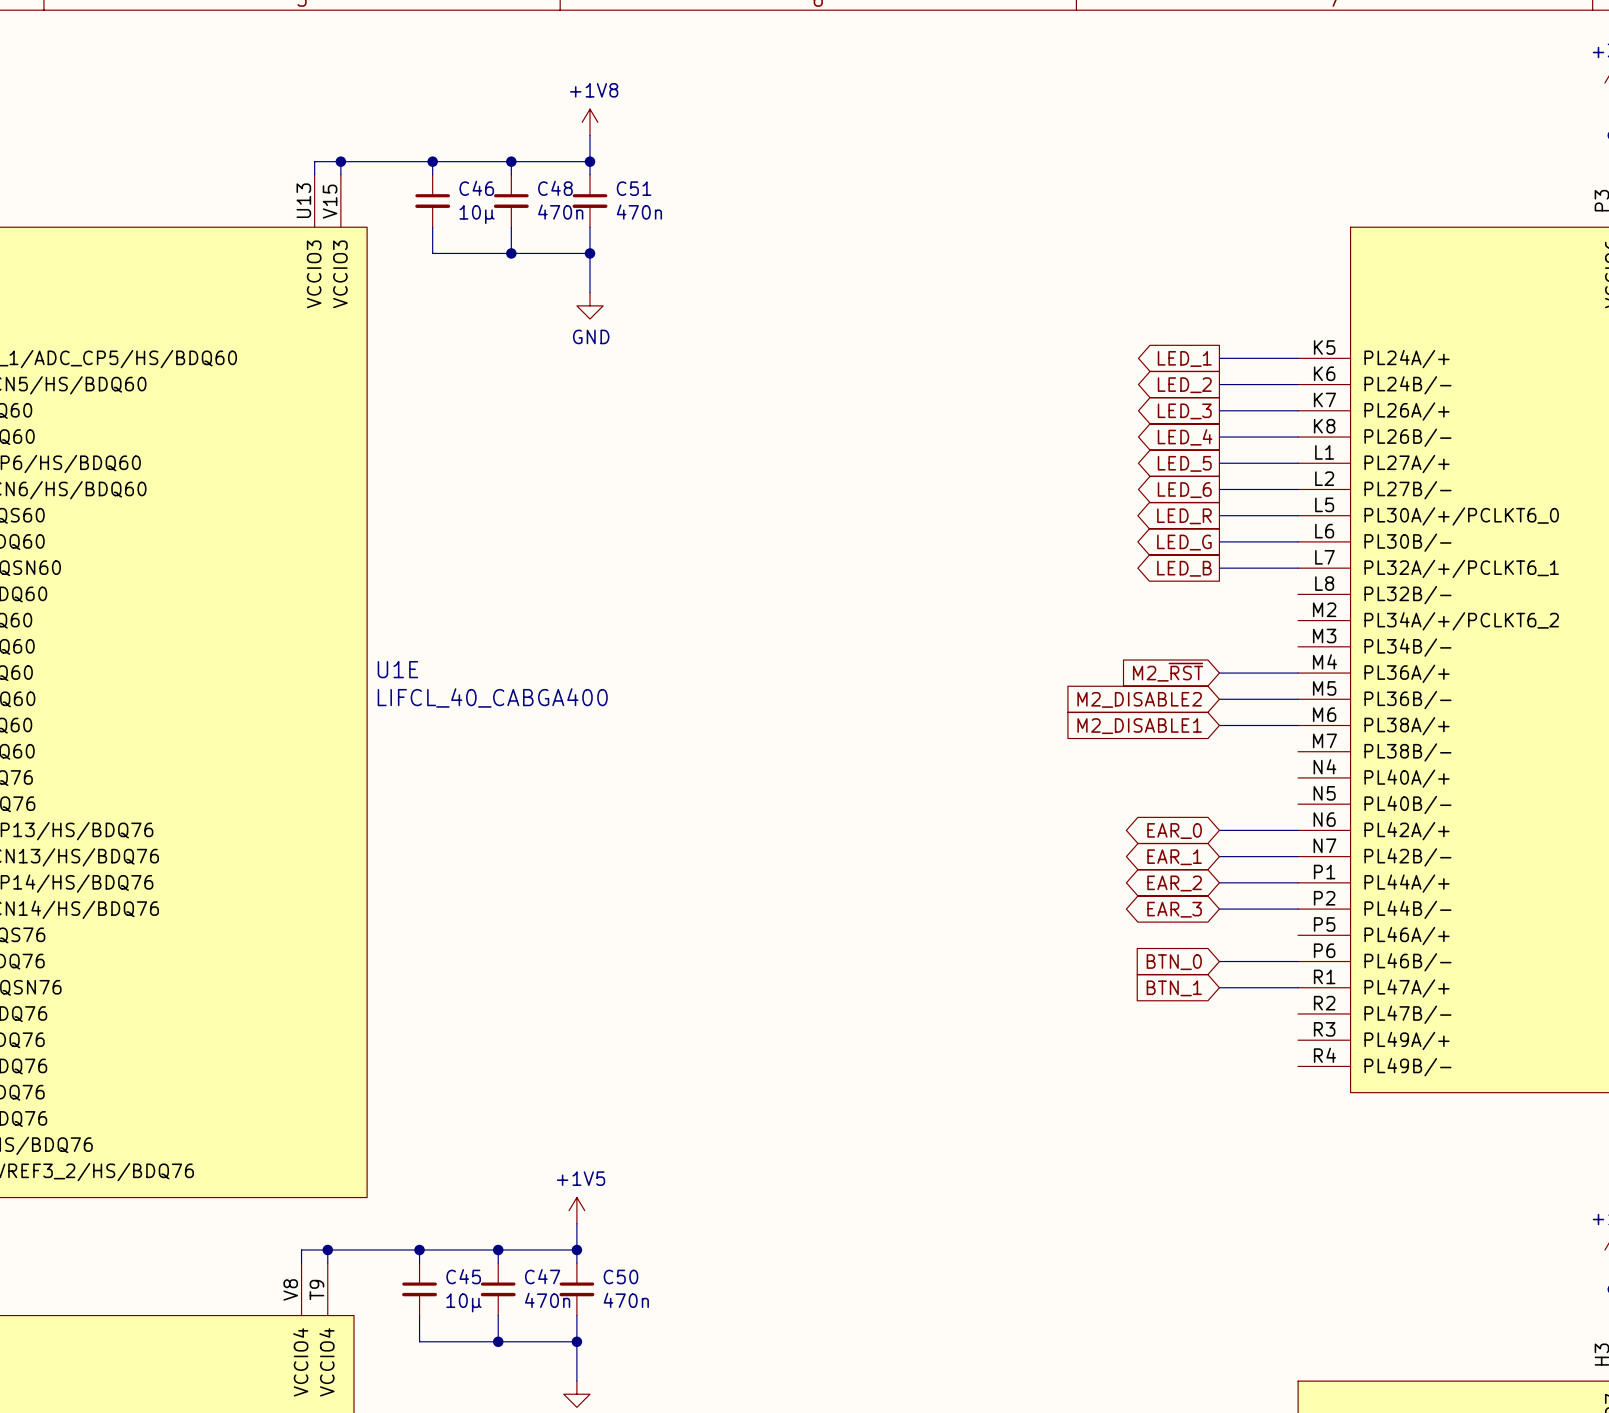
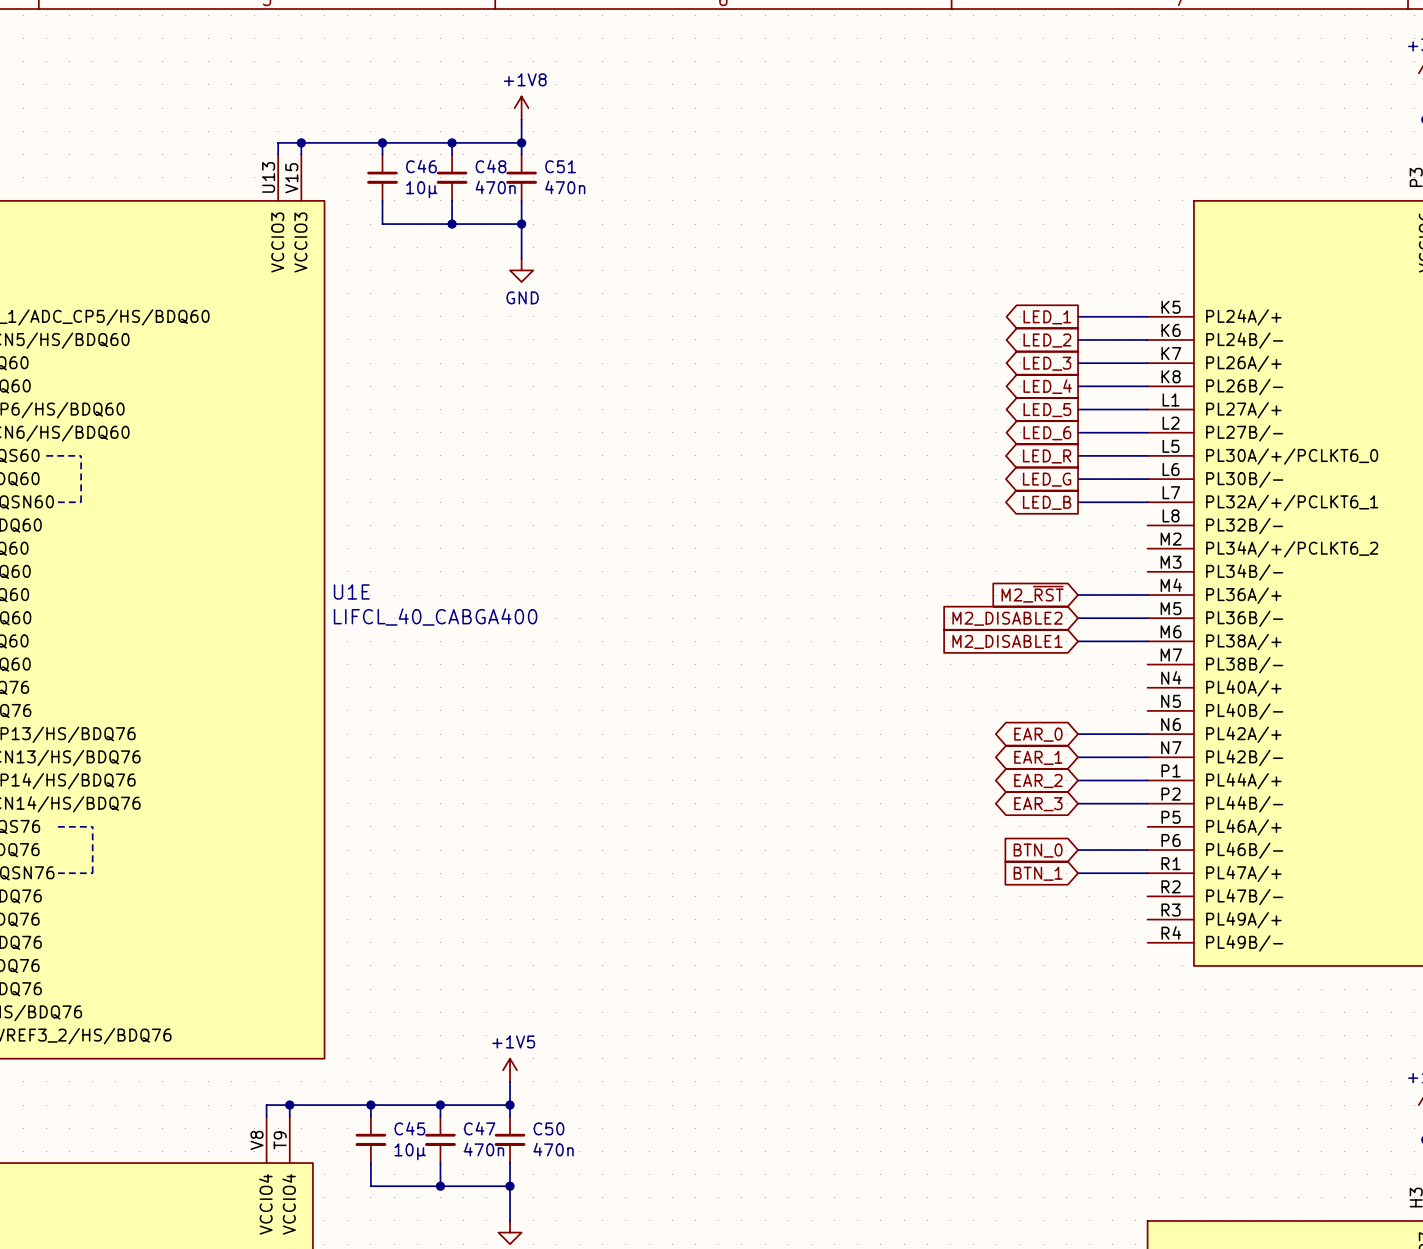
line: none -> (46, 455) (81, 455) (81, 502) (57, 502)
line: none -> (57, 826) (92, 826) (92, 873) (57, 873)

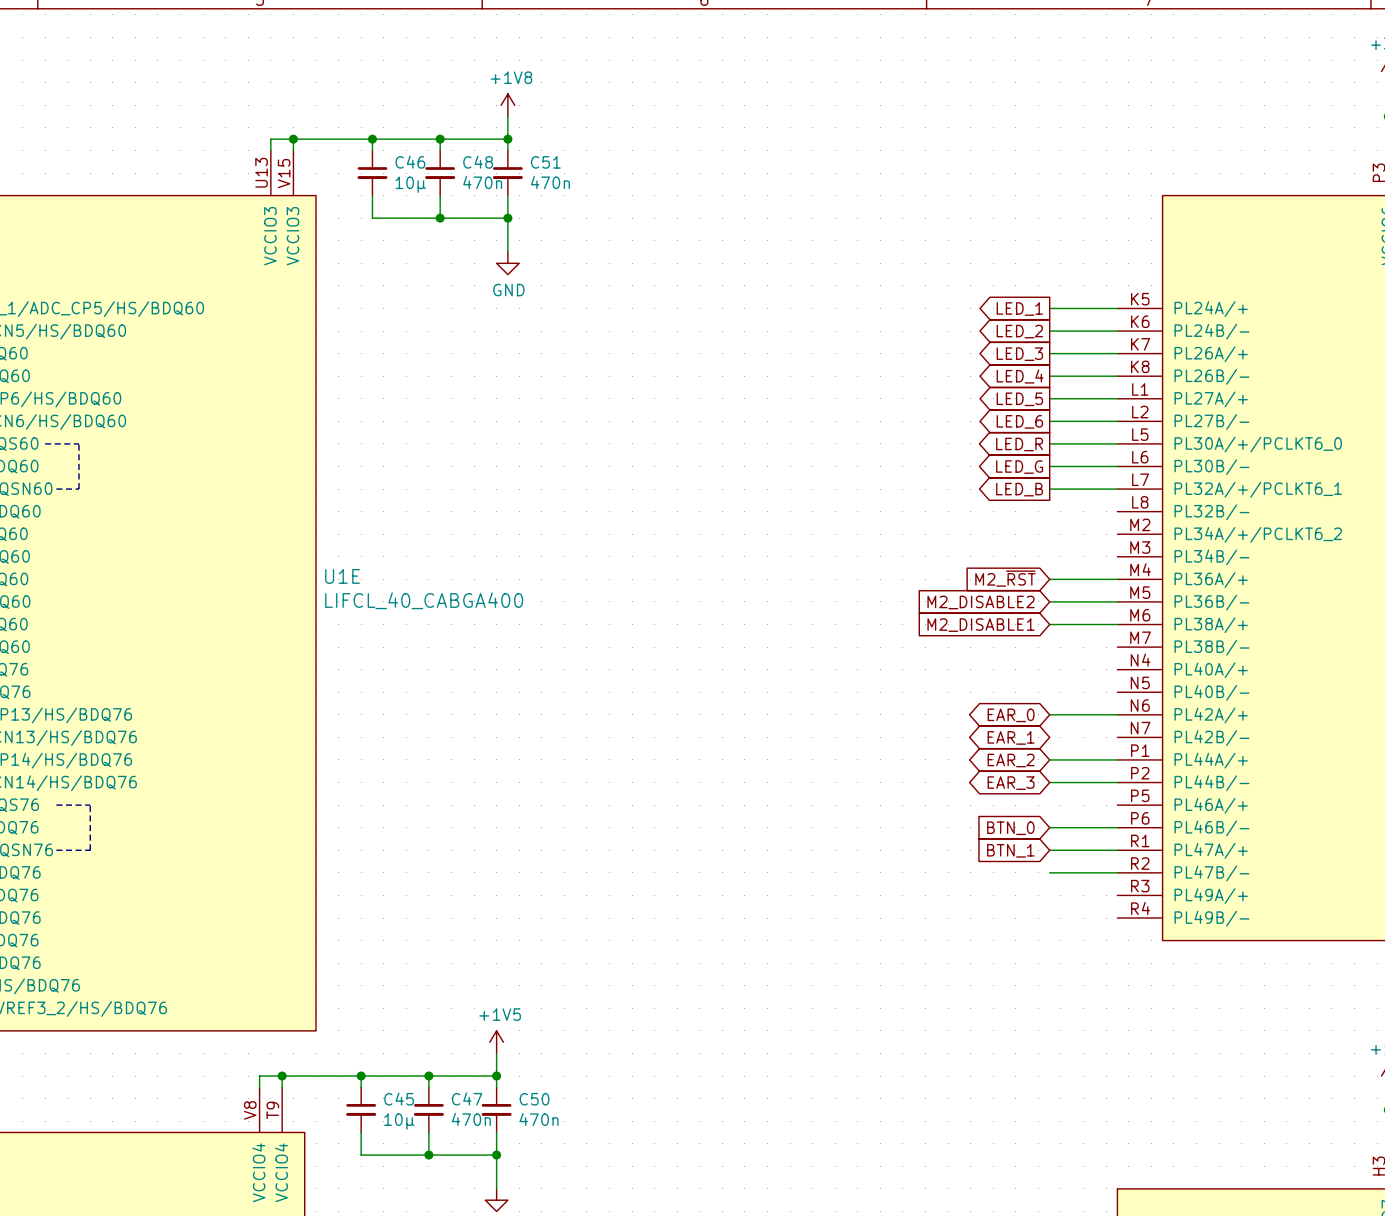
wire: (1078, 757) (1147, 757) -> (1049, 872) (1117, 872)

